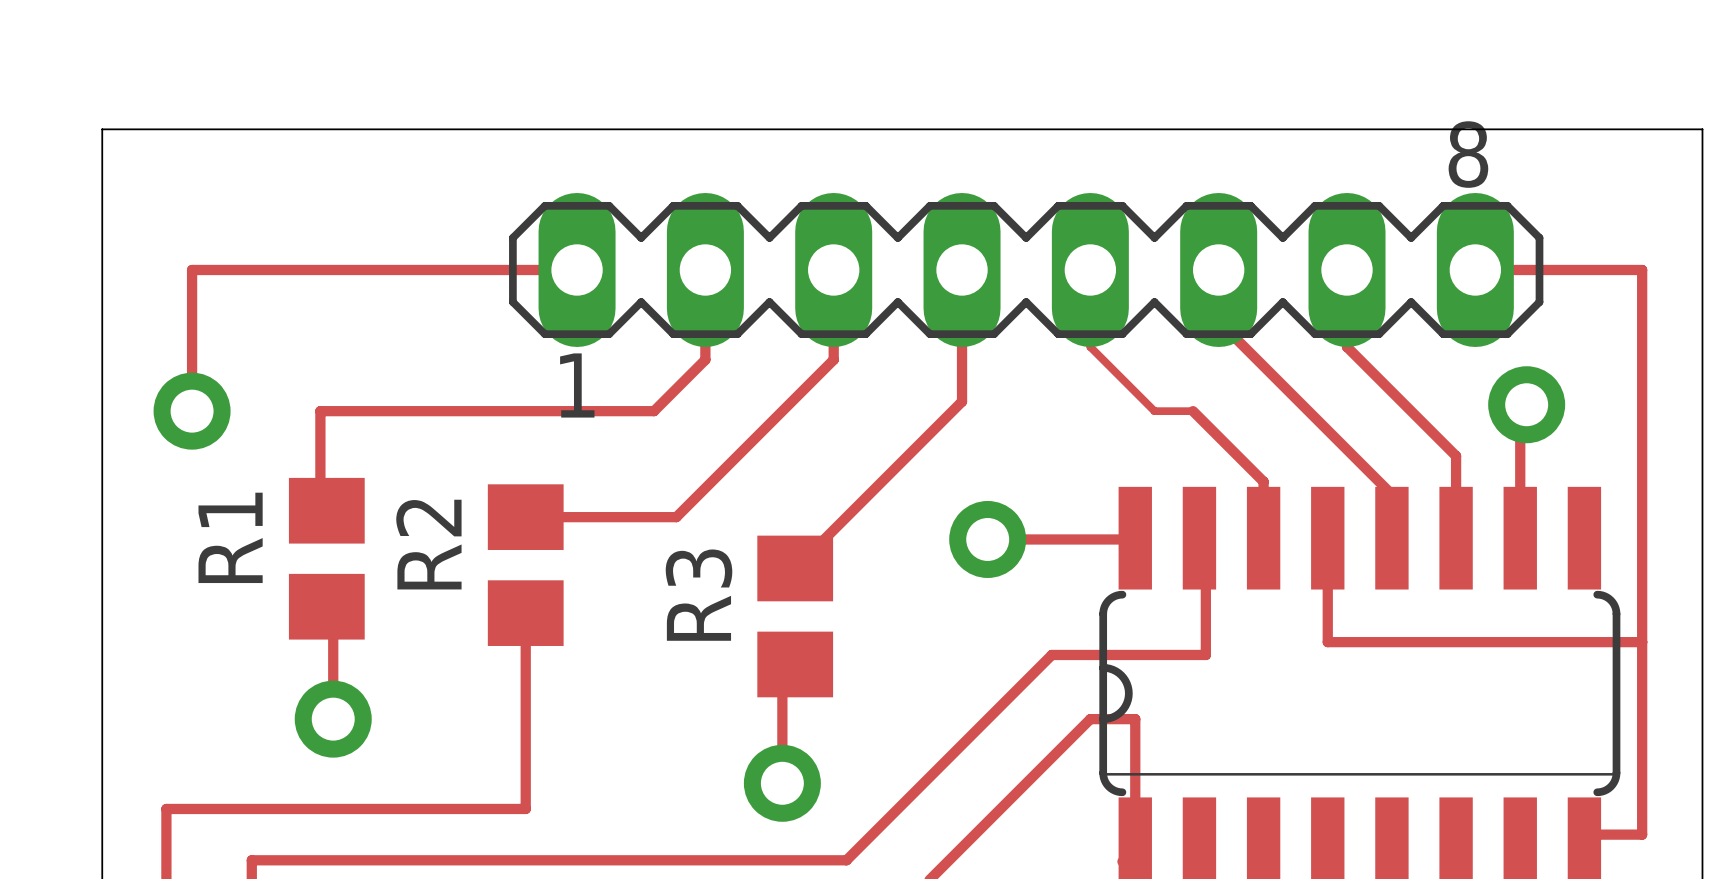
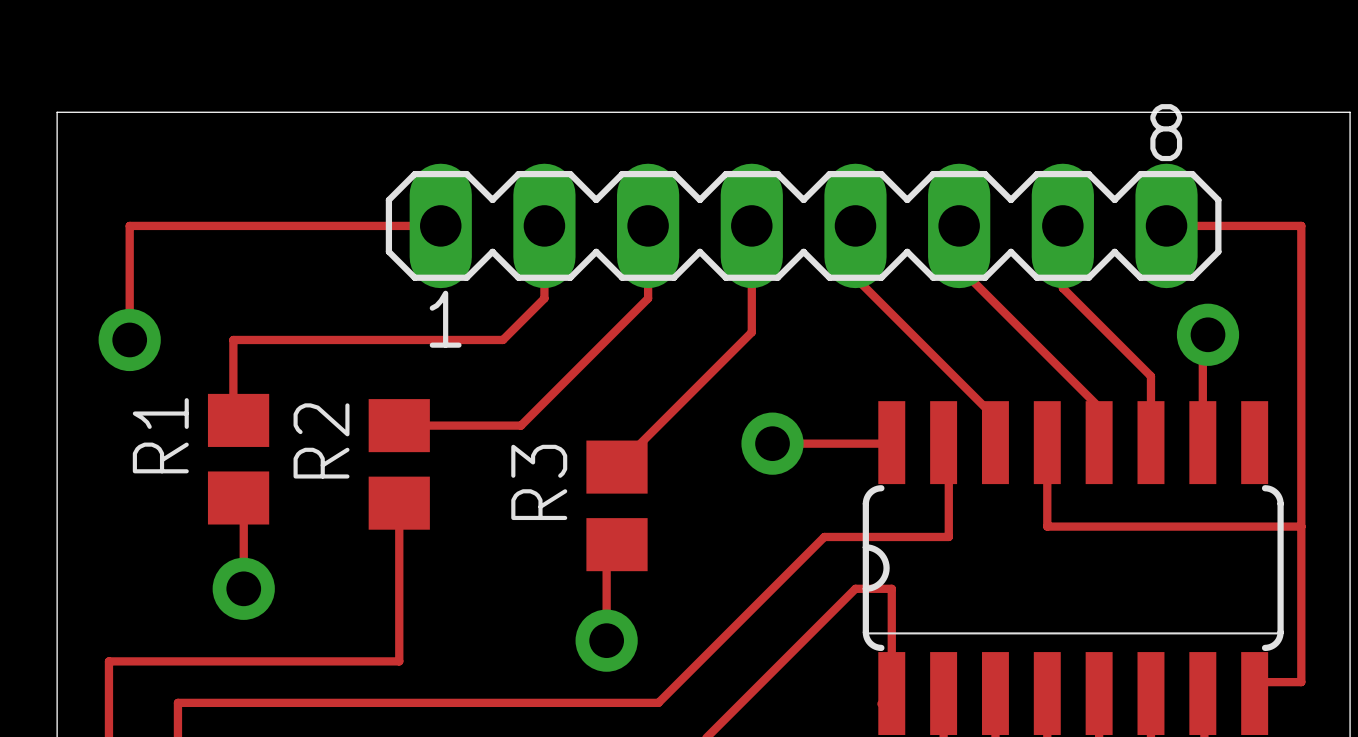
track: (1090, 334) (1090, 346) (1154, 411) (1193, 411) (1263, 481) (1263, 507) -> (855, 277) (995, 417)

